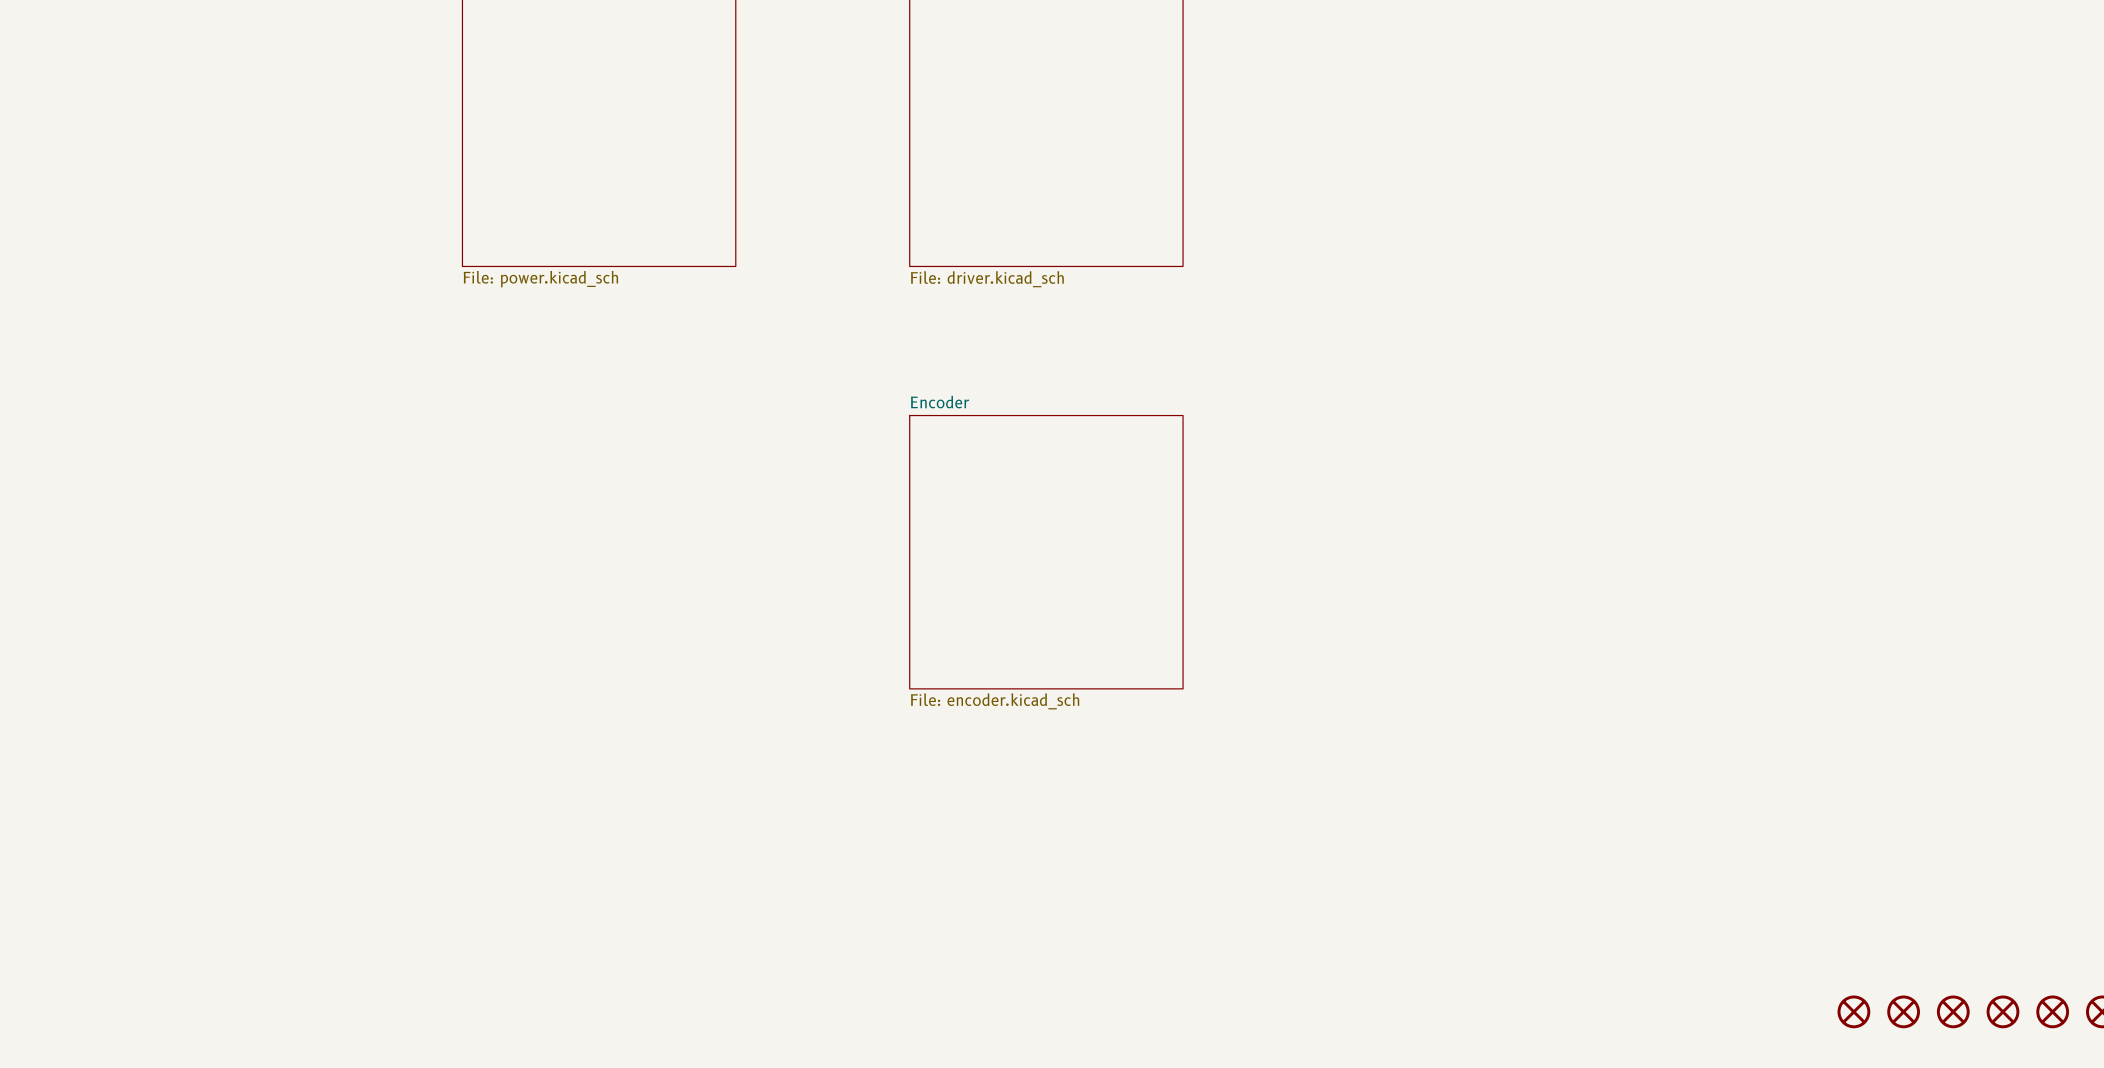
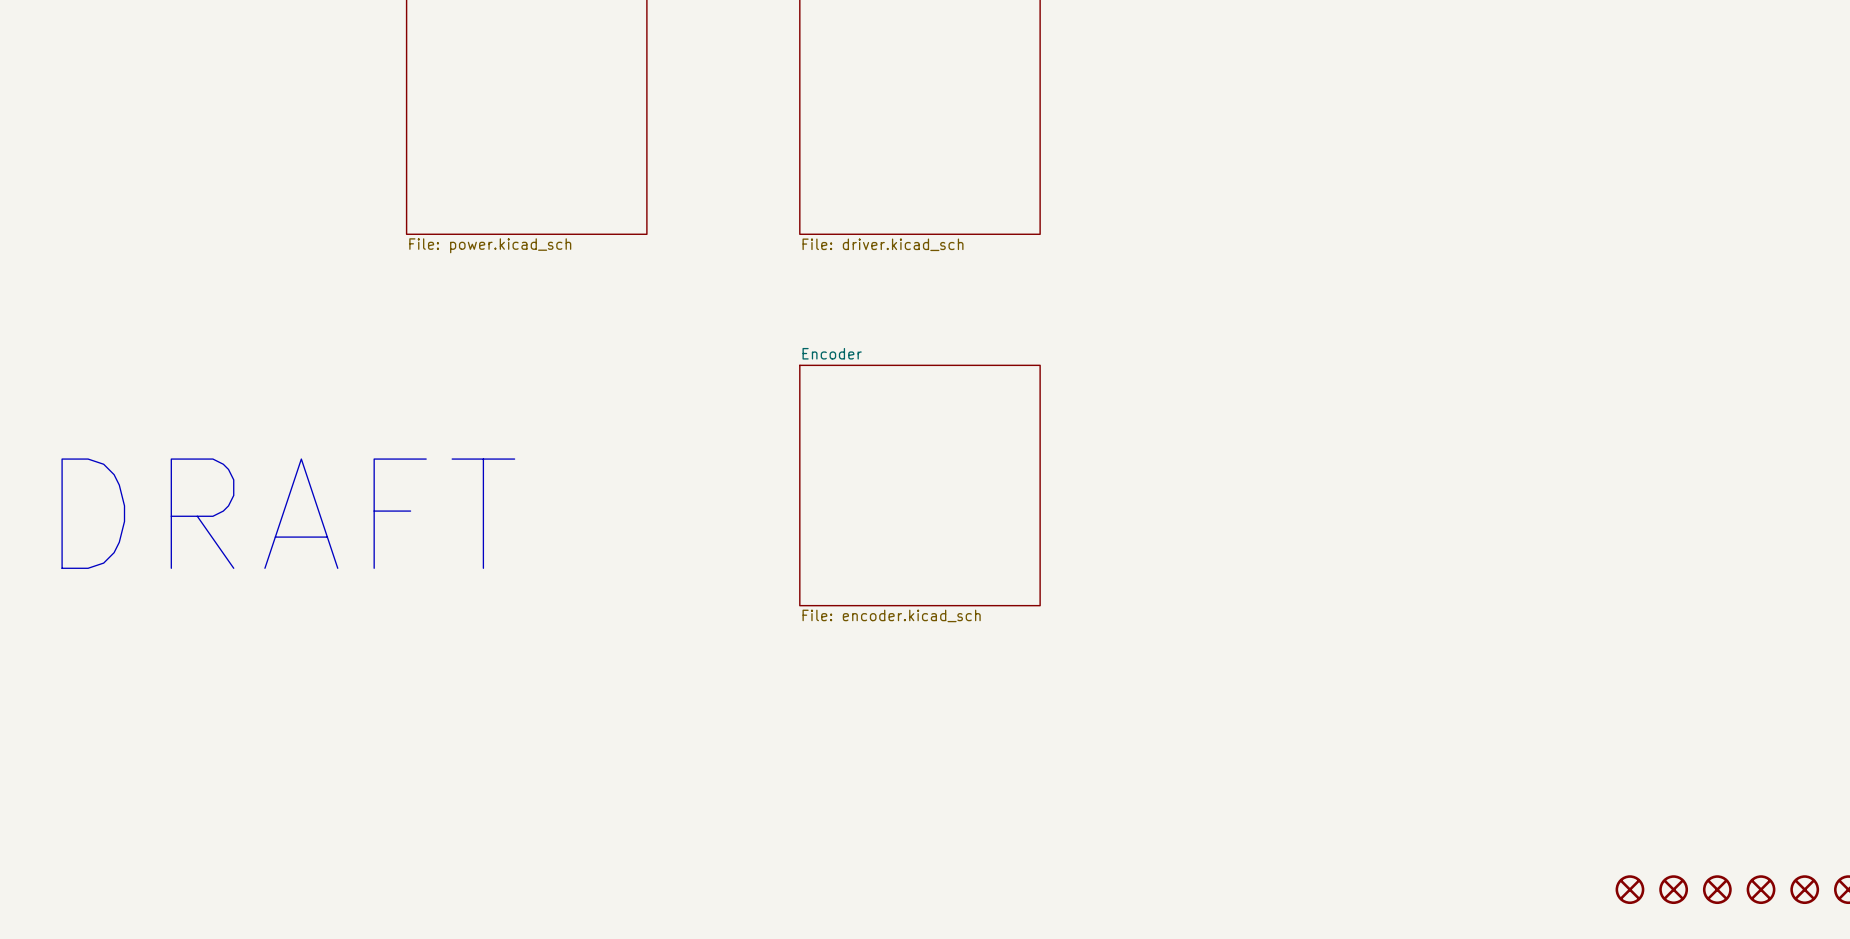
text: none -> DRAFT (288, 513)

